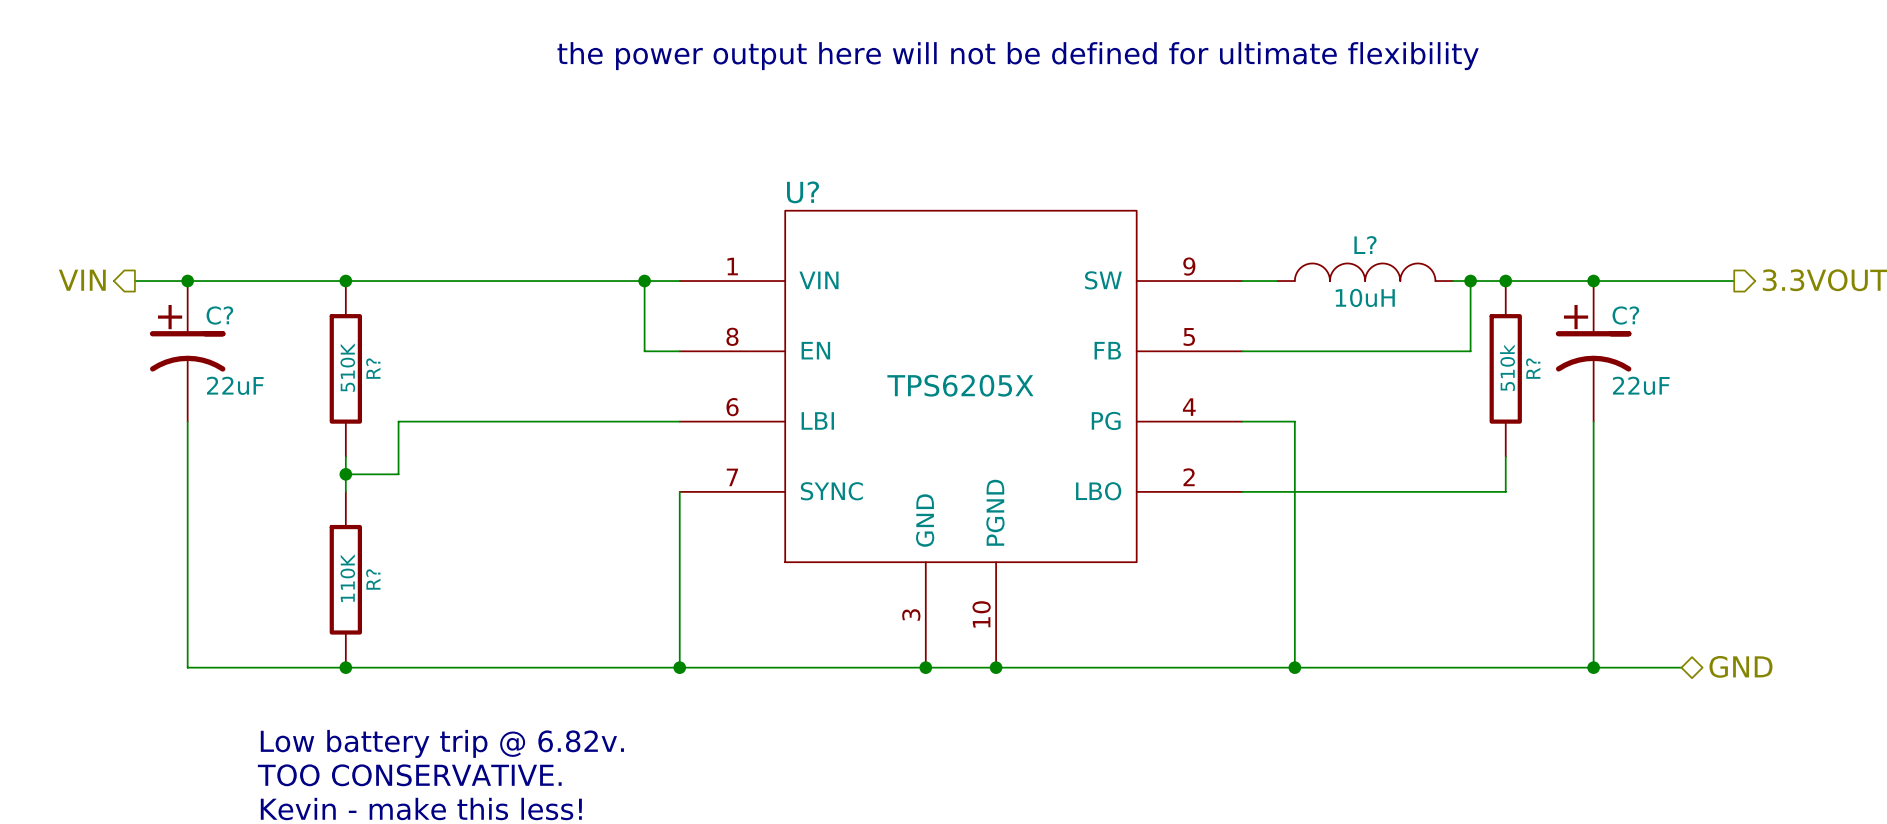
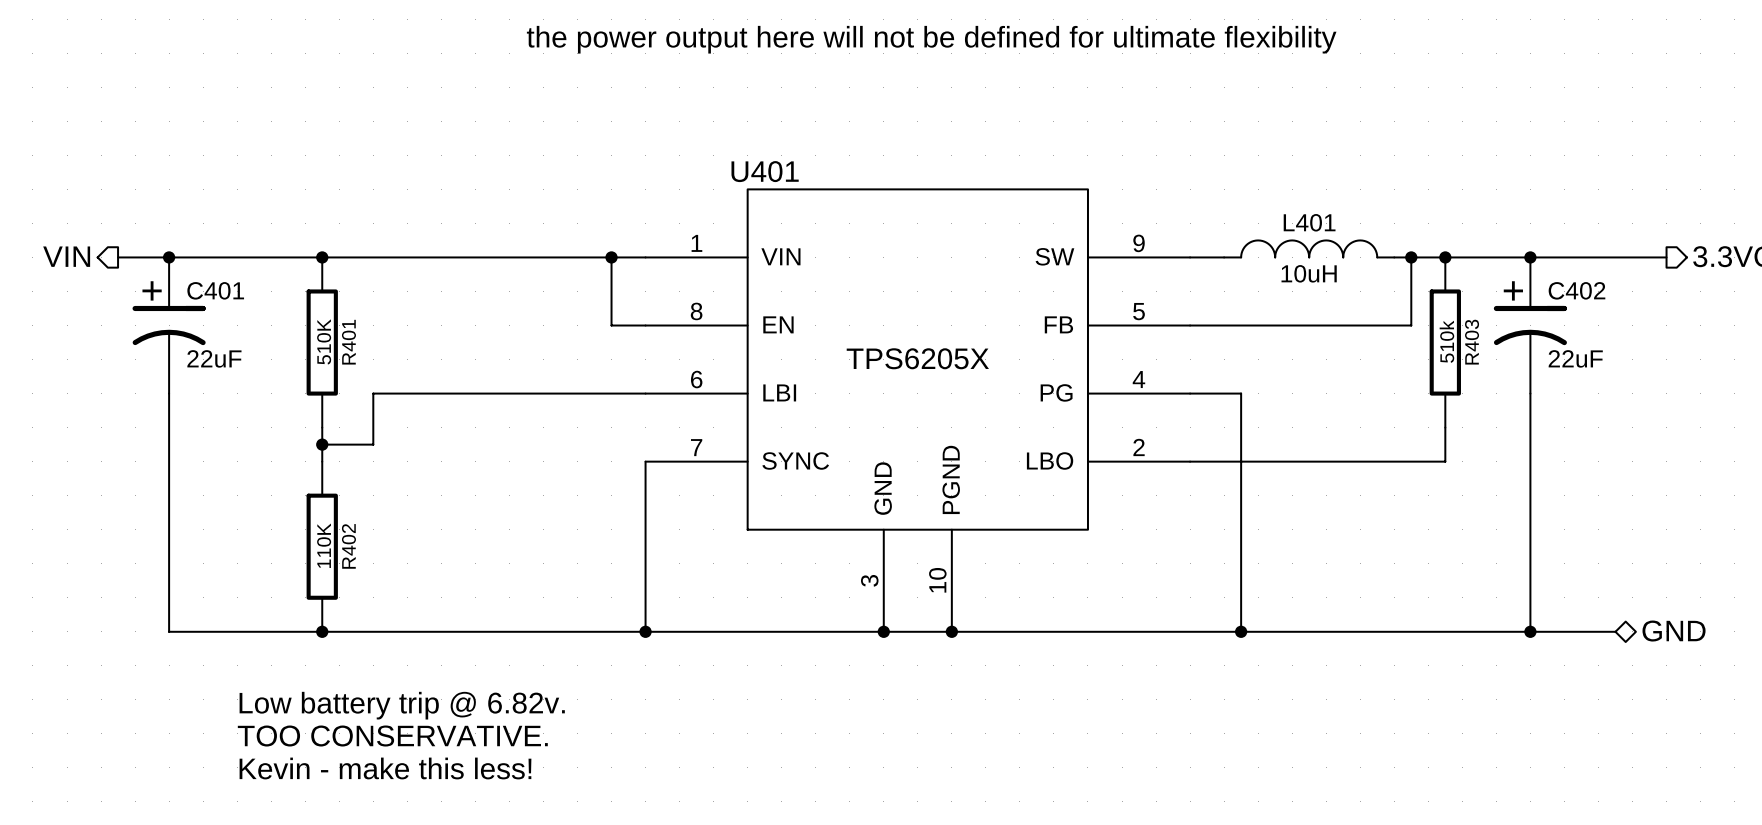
U? name: U? (803, 192) -> U401 (765, 171)
L? name: L? (1365, 245) -> L401 (1309, 222)
C? name: C? (219, 315) -> C401 (215, 290)
C? name: C? (1625, 315) -> C402 (1576, 290)
R? name: R? (373, 368) -> R401 (348, 342)
R? name: R? (1533, 368) -> R403 (1472, 342)
R? name: R? (373, 579) -> R402 (348, 546)

